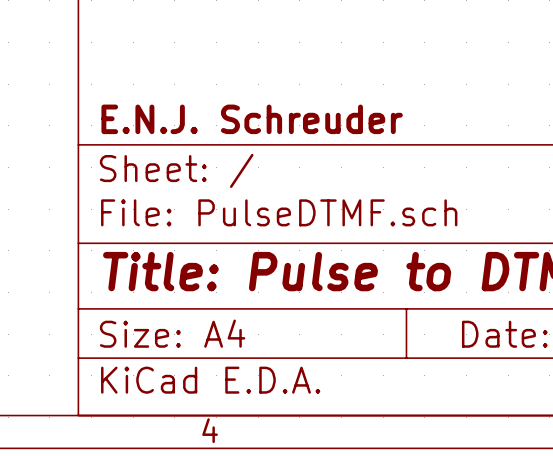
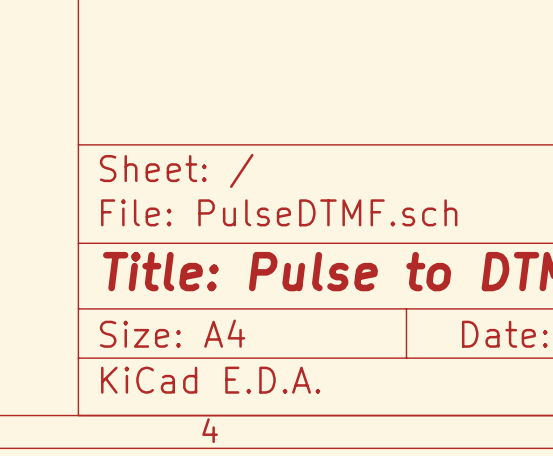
title block: E.N.J. Schreuder (252, 119) -> none

